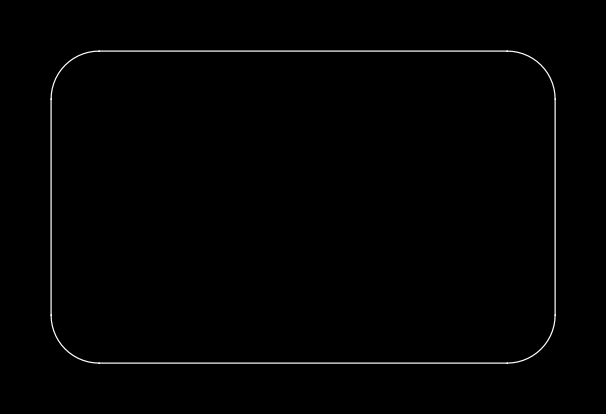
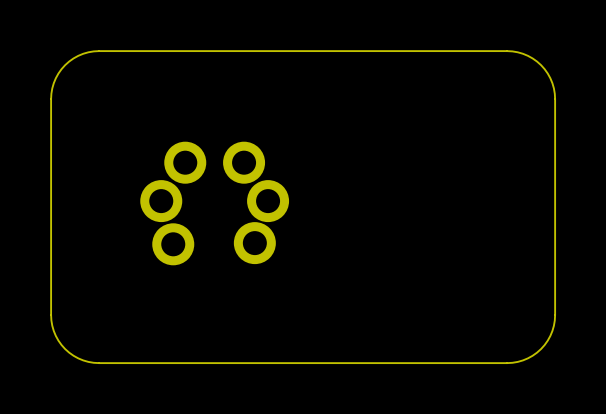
part: none -> (214, 203)

